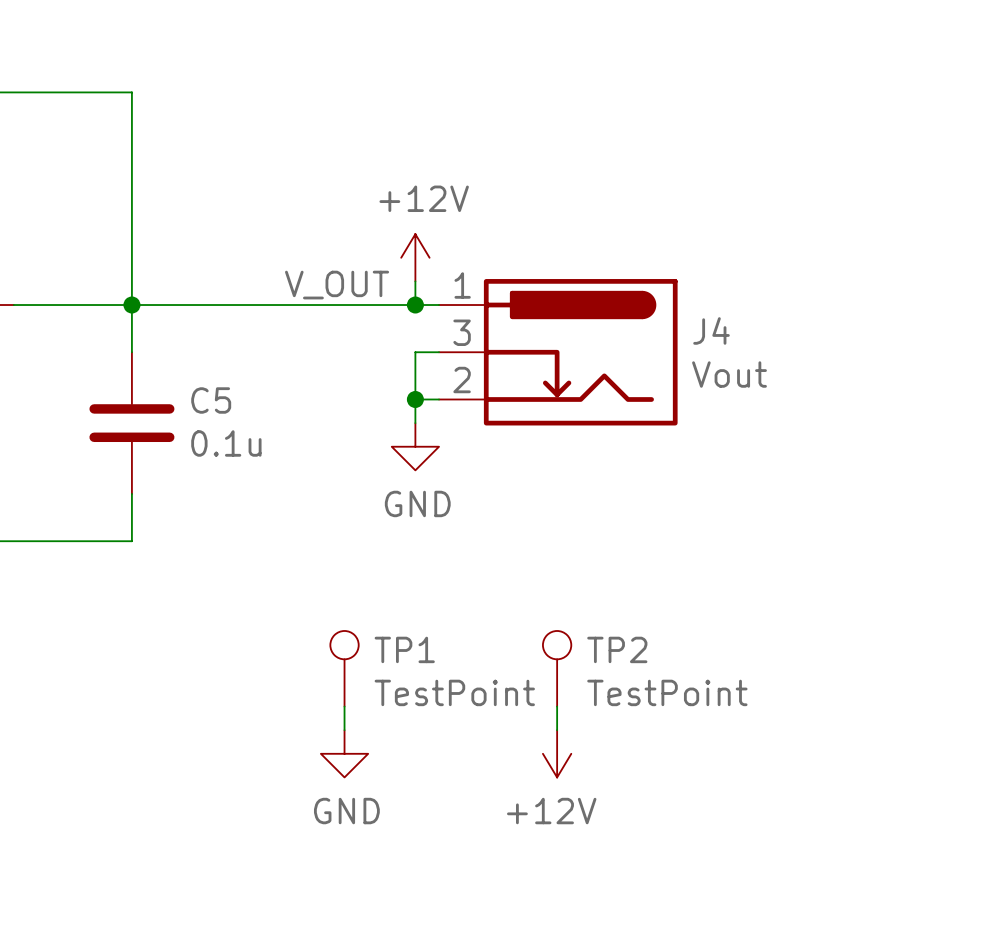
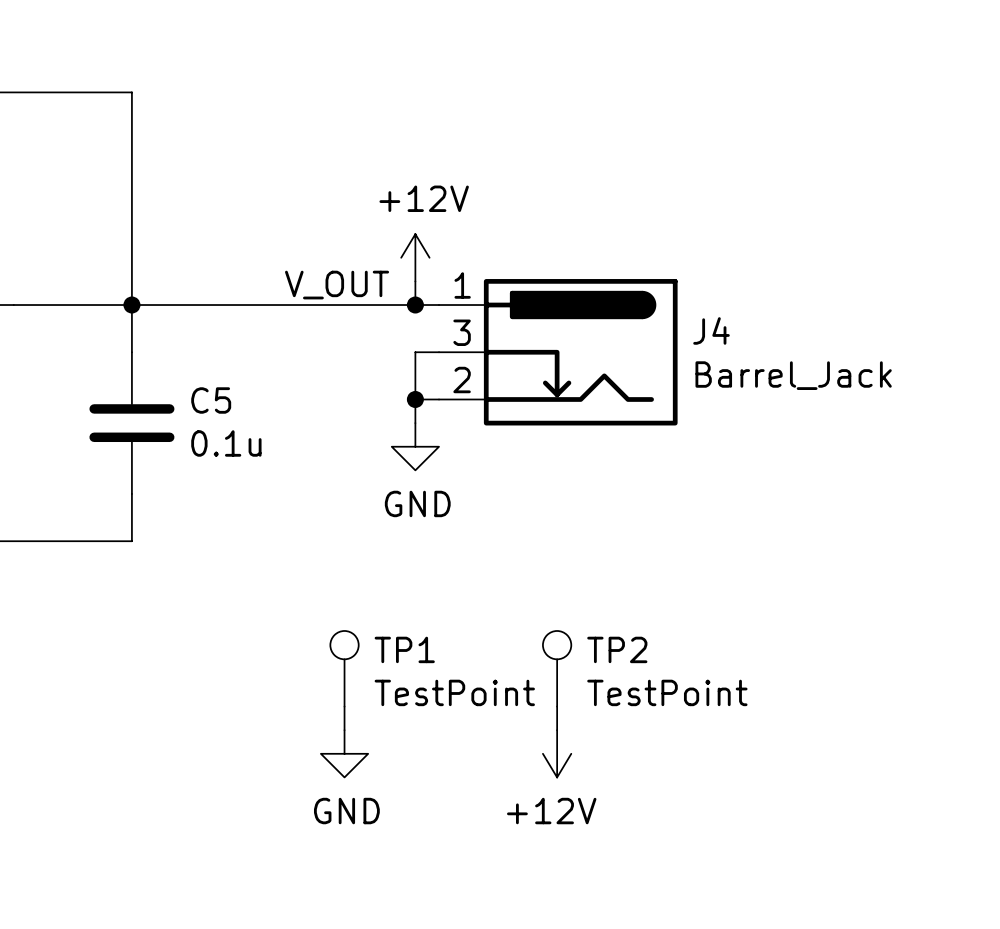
J4 value: Vout (729, 374) -> Barrel_Jack (793, 375)

